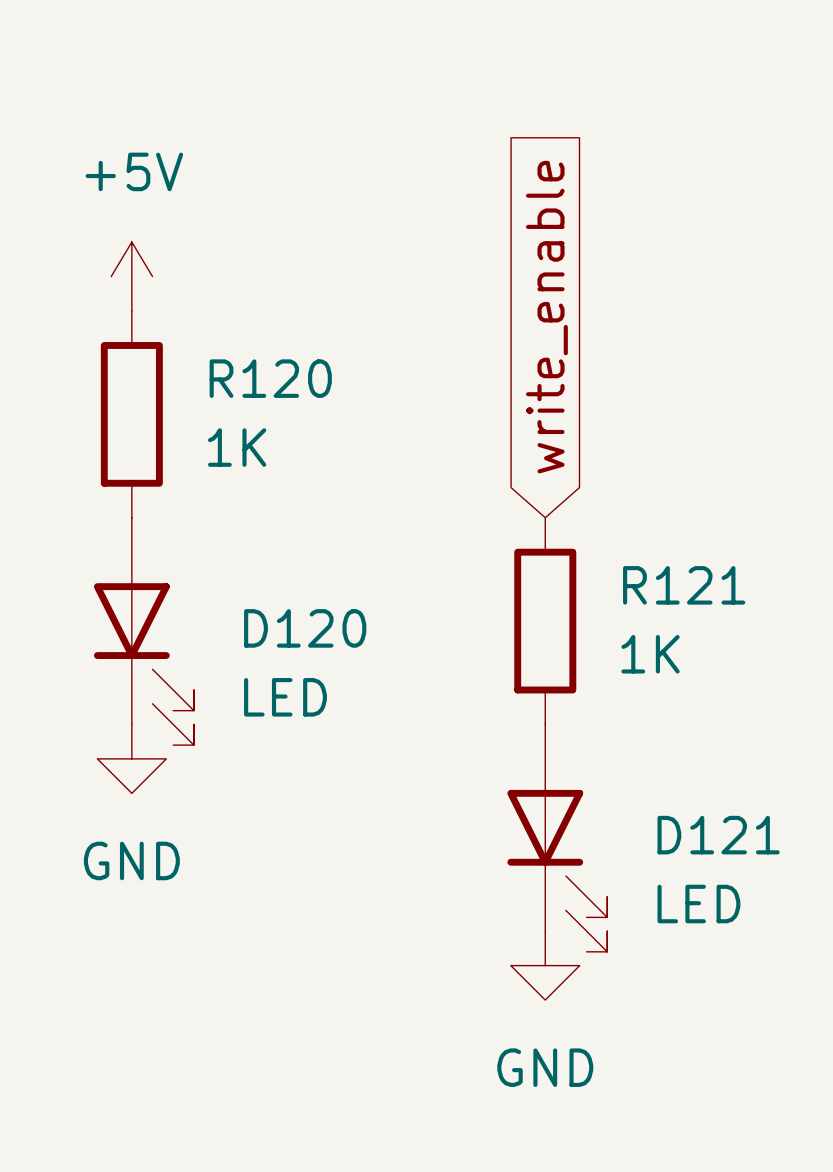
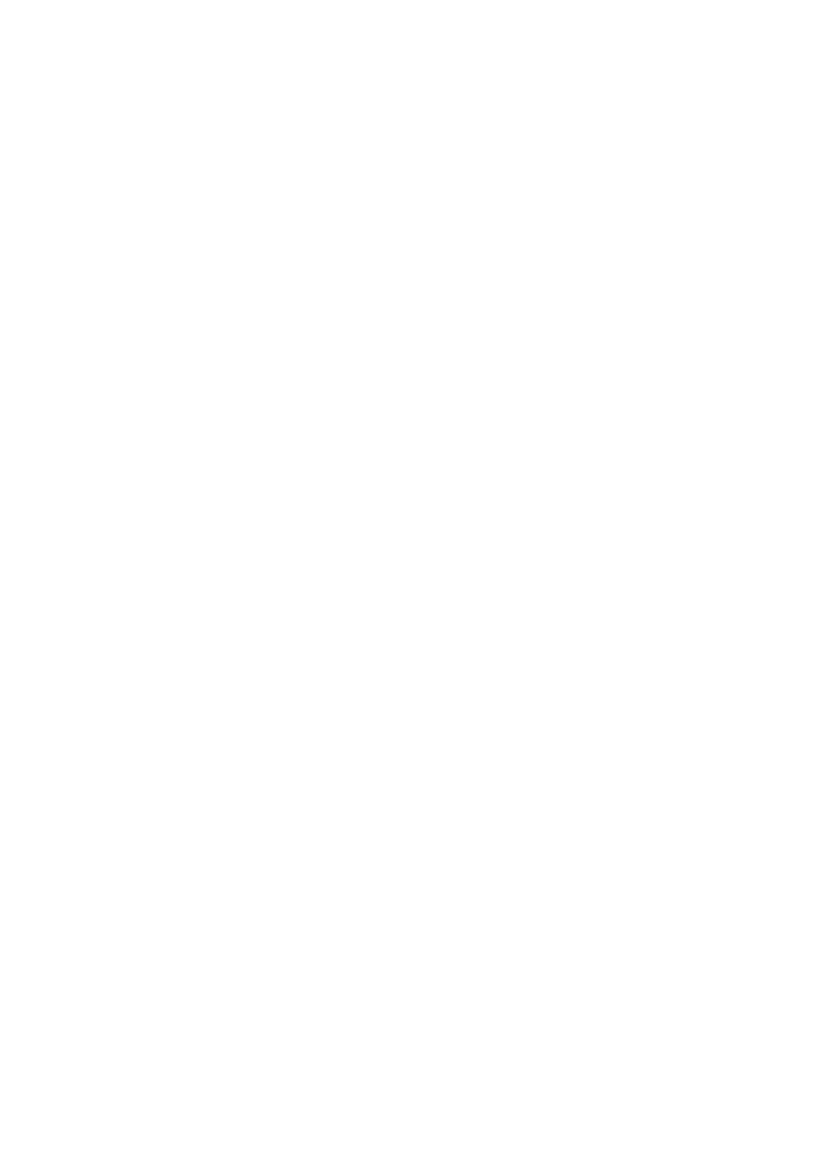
power symbol: +5V (131, 276) -> none
global label: write_enable (546, 317) -> none
R120: 1K (131, 414) -> none
R121: 1K (545, 621) -> none
D120: LED (143, 631) -> none
power symbol: GND (131, 758) -> none
D121: LED (557, 838) -> none
power symbol: GND (545, 965) -> none

